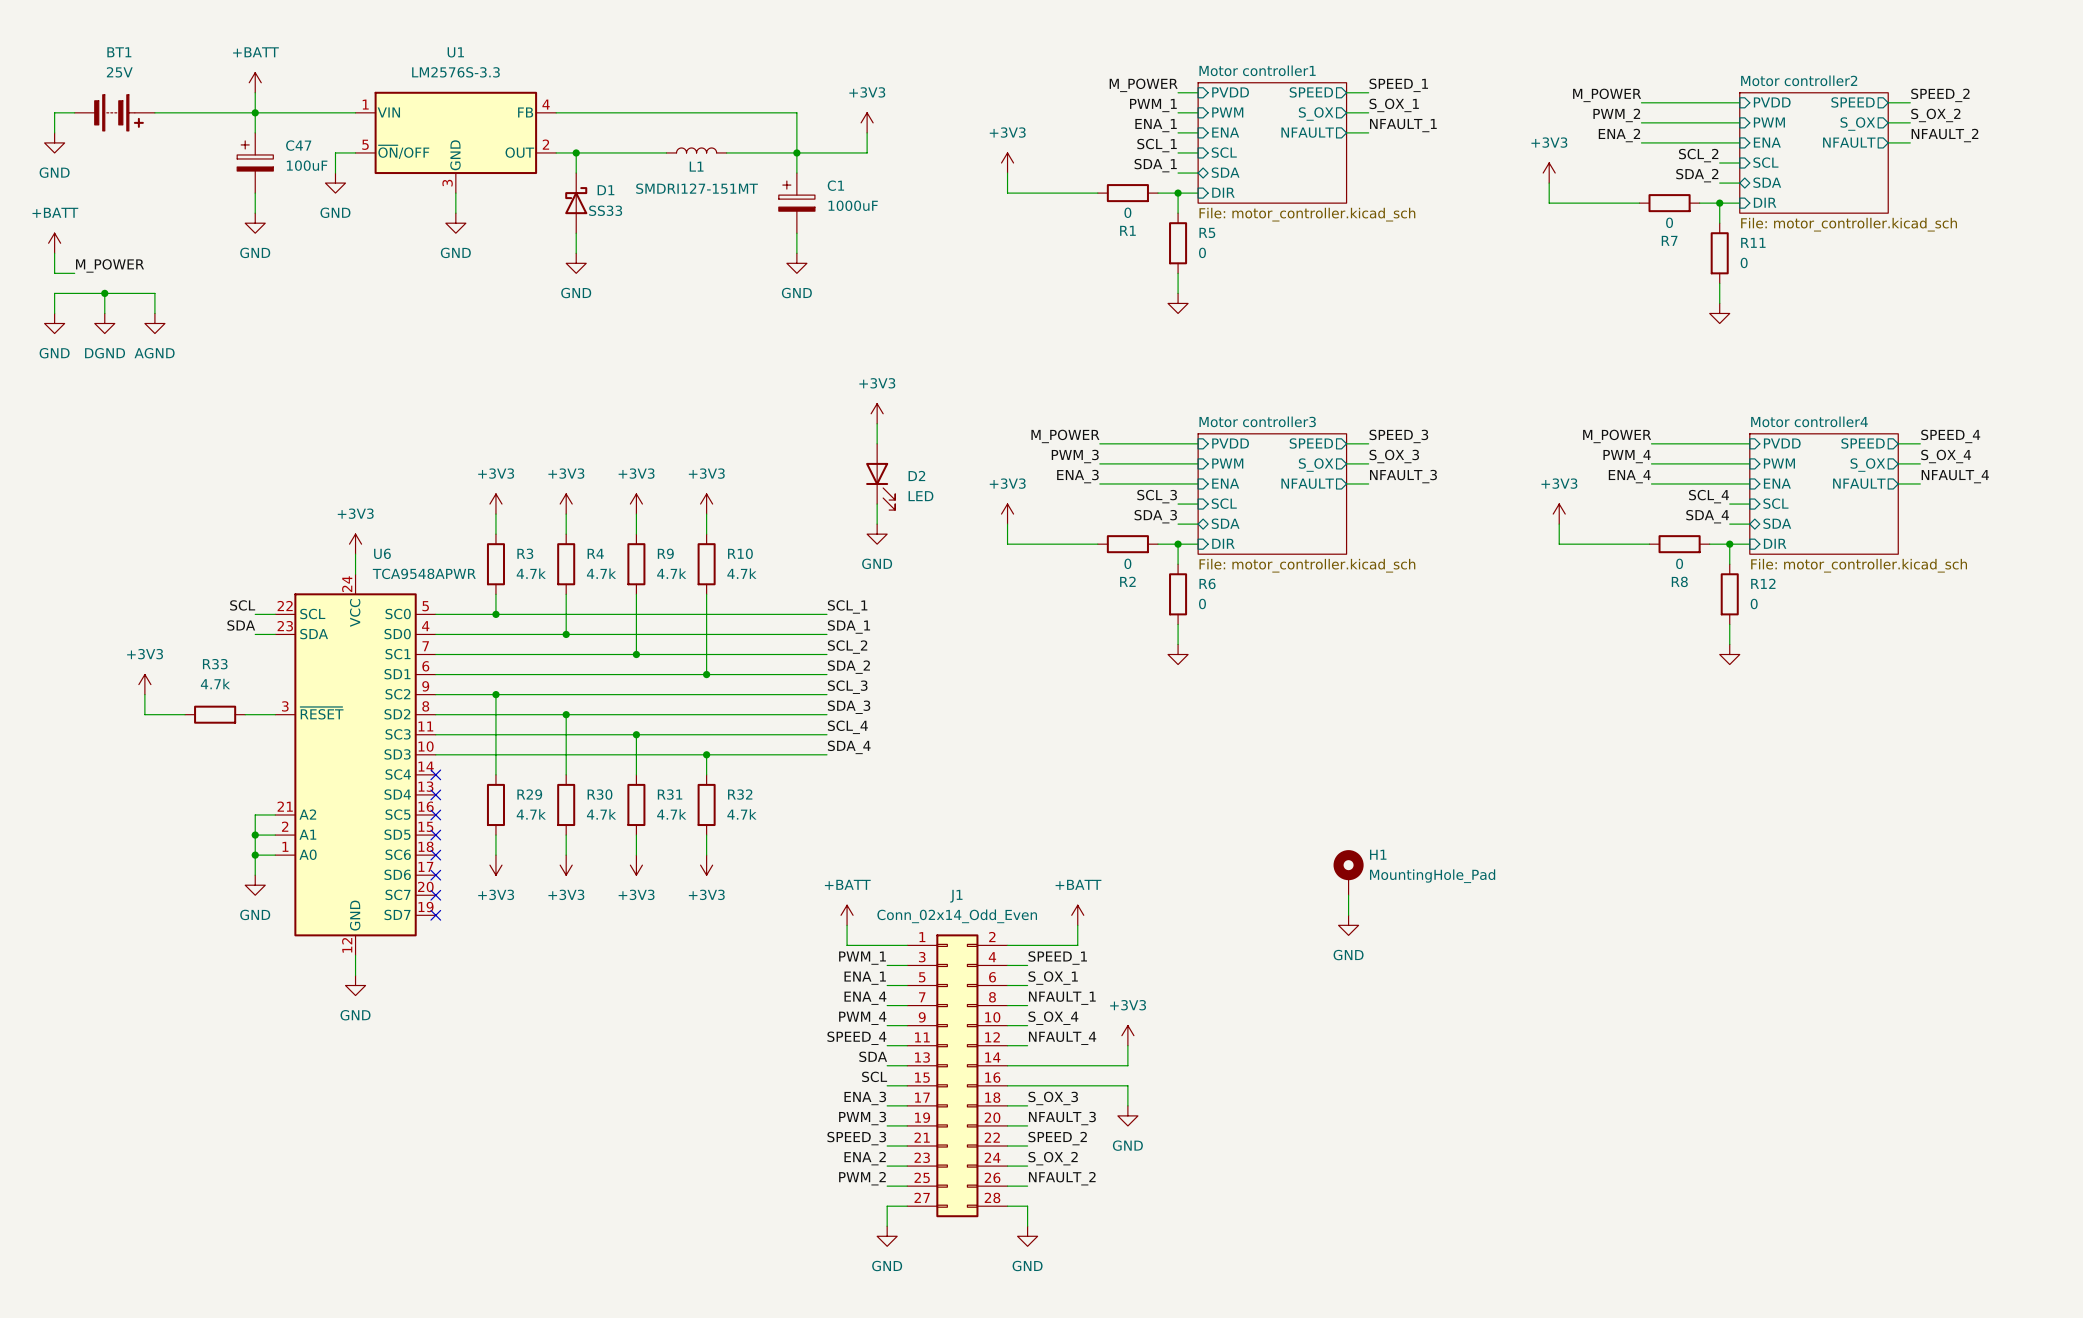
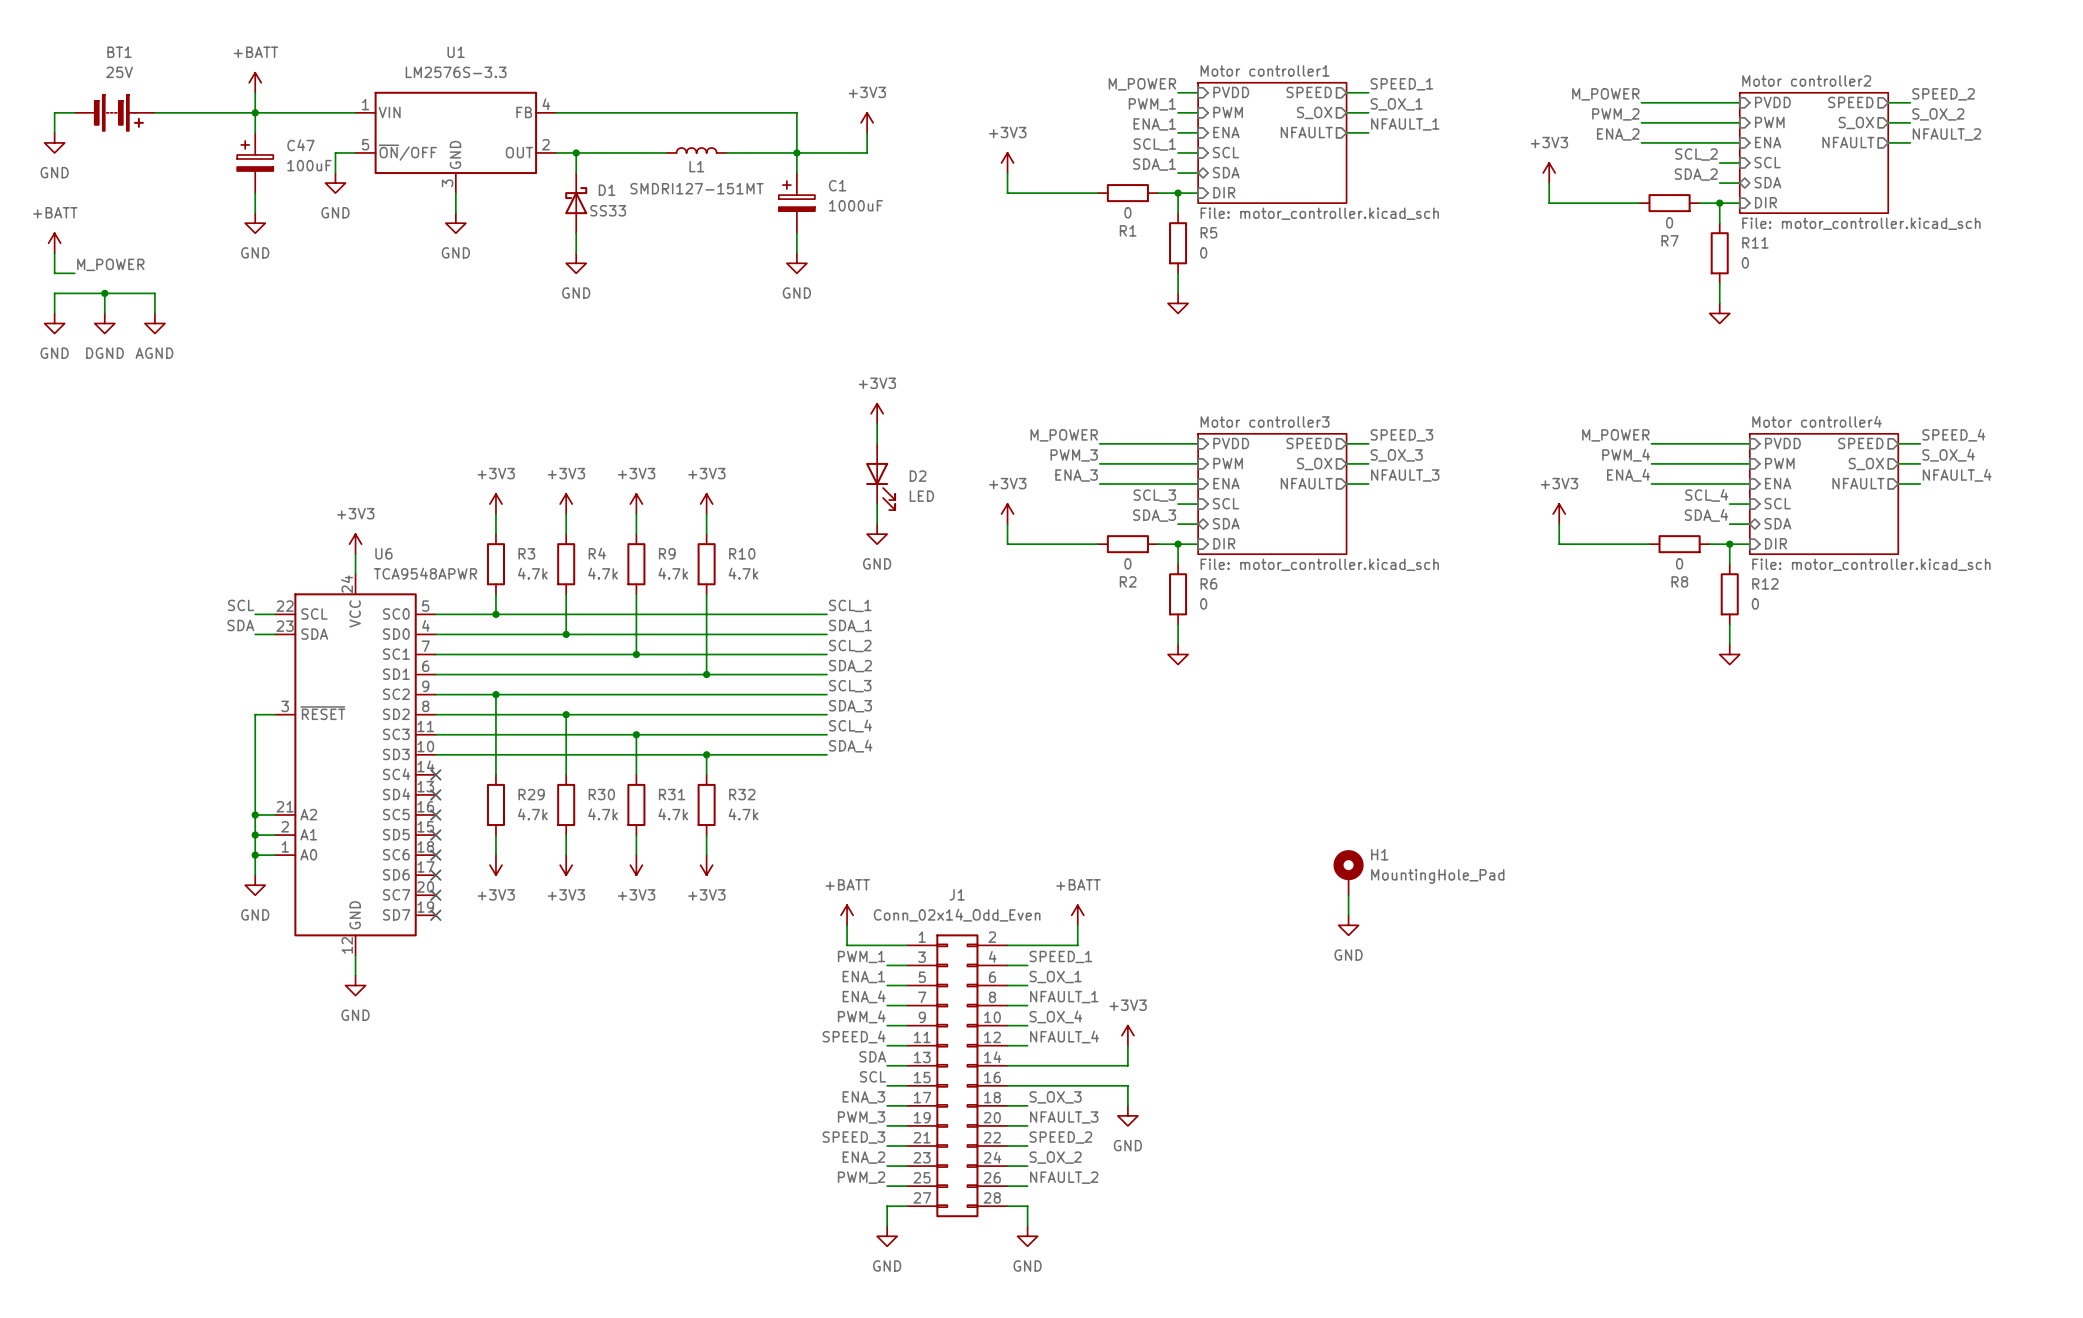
power symbol: +3V3 (144, 684) -> none
wire: (144, 694) (144, 714) (185, 714) -> none
R33: 4.7k (215, 714) -> none
wire: (245, 714) (255, 714) -> (255, 814) (255, 714)
junction: none -> (255, 814)

